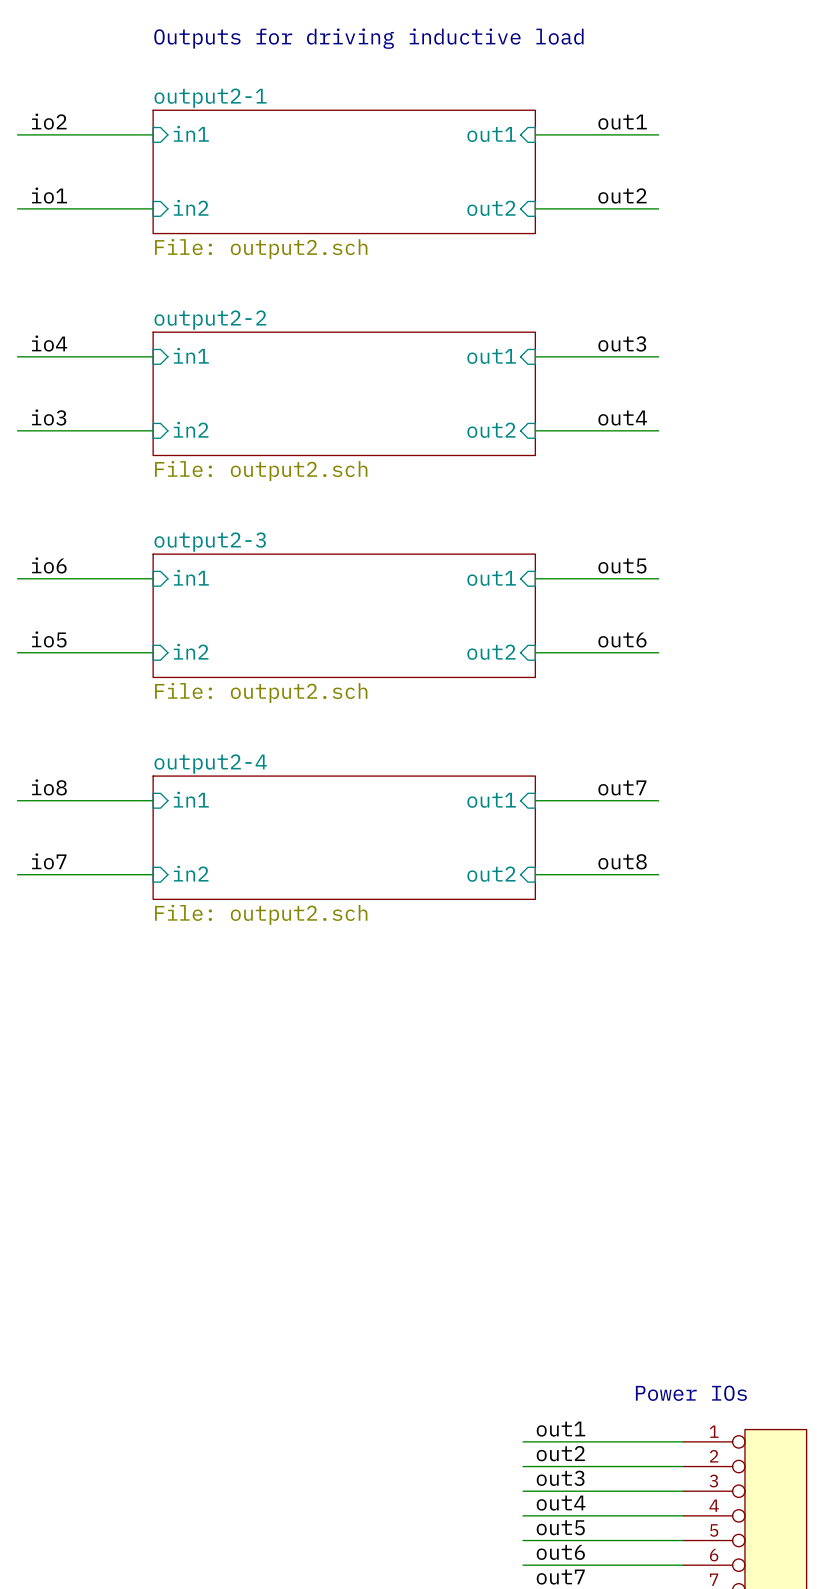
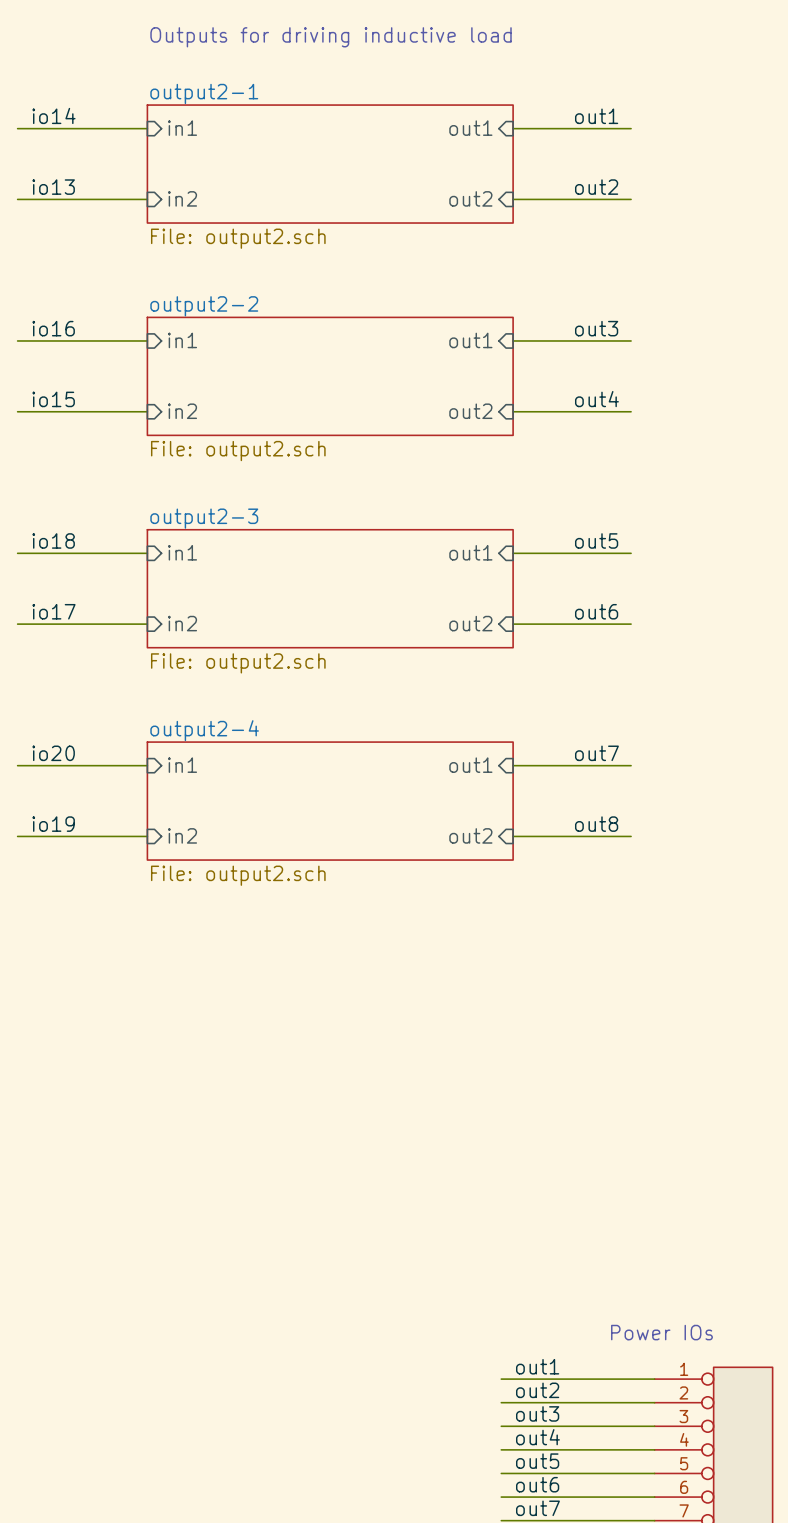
label: io2 (49, 121) -> io14 (53, 115)
label: io1 (49, 195) -> io13 (53, 187)
label: io4 (49, 343) -> io16 (53, 328)
label: io3 (49, 417) -> io15 (53, 399)
label: io6 (49, 565) -> io18 (53, 540)
label: io5 (49, 639) -> io17 (53, 611)
label: io8 (49, 787) -> io20 (53, 753)
label: io7 (49, 861) -> io19 (53, 824)

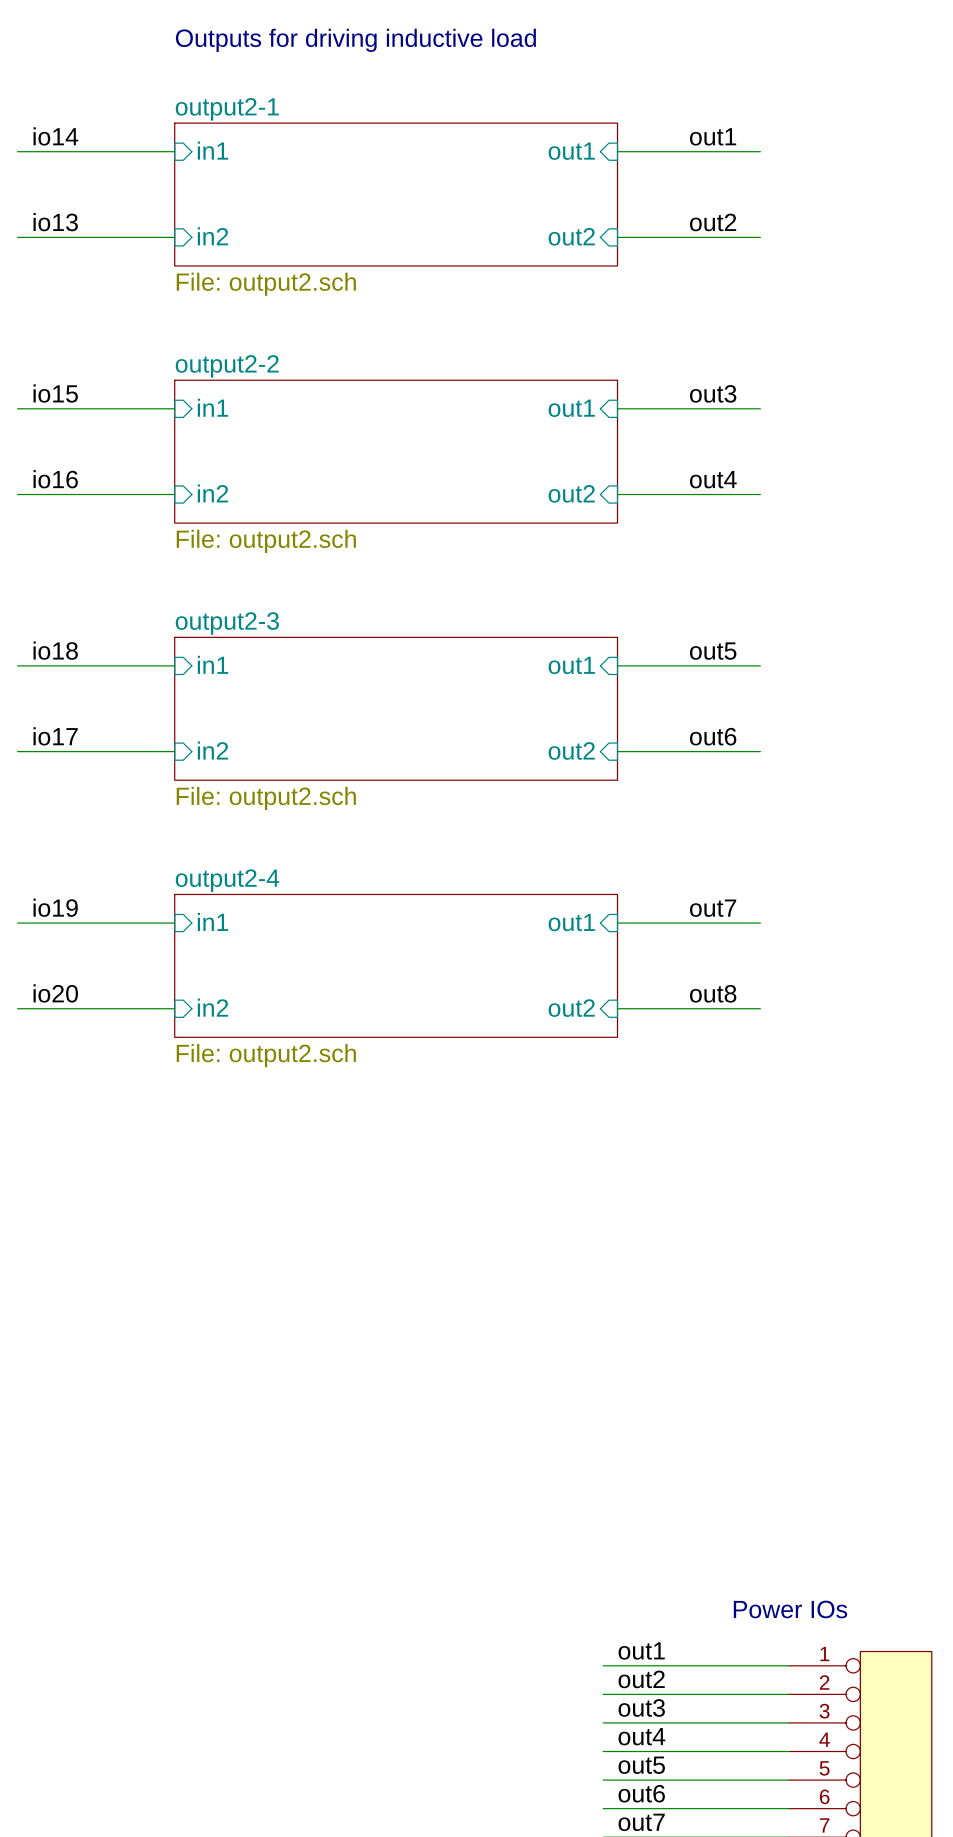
label: io16 (53, 328) -> io15 (55, 393)
label: io15 (53, 399) -> io16 (55, 479)
label: io20 (53, 753) -> io19 (55, 907)
label: io19 (53, 824) -> io20 (55, 993)

